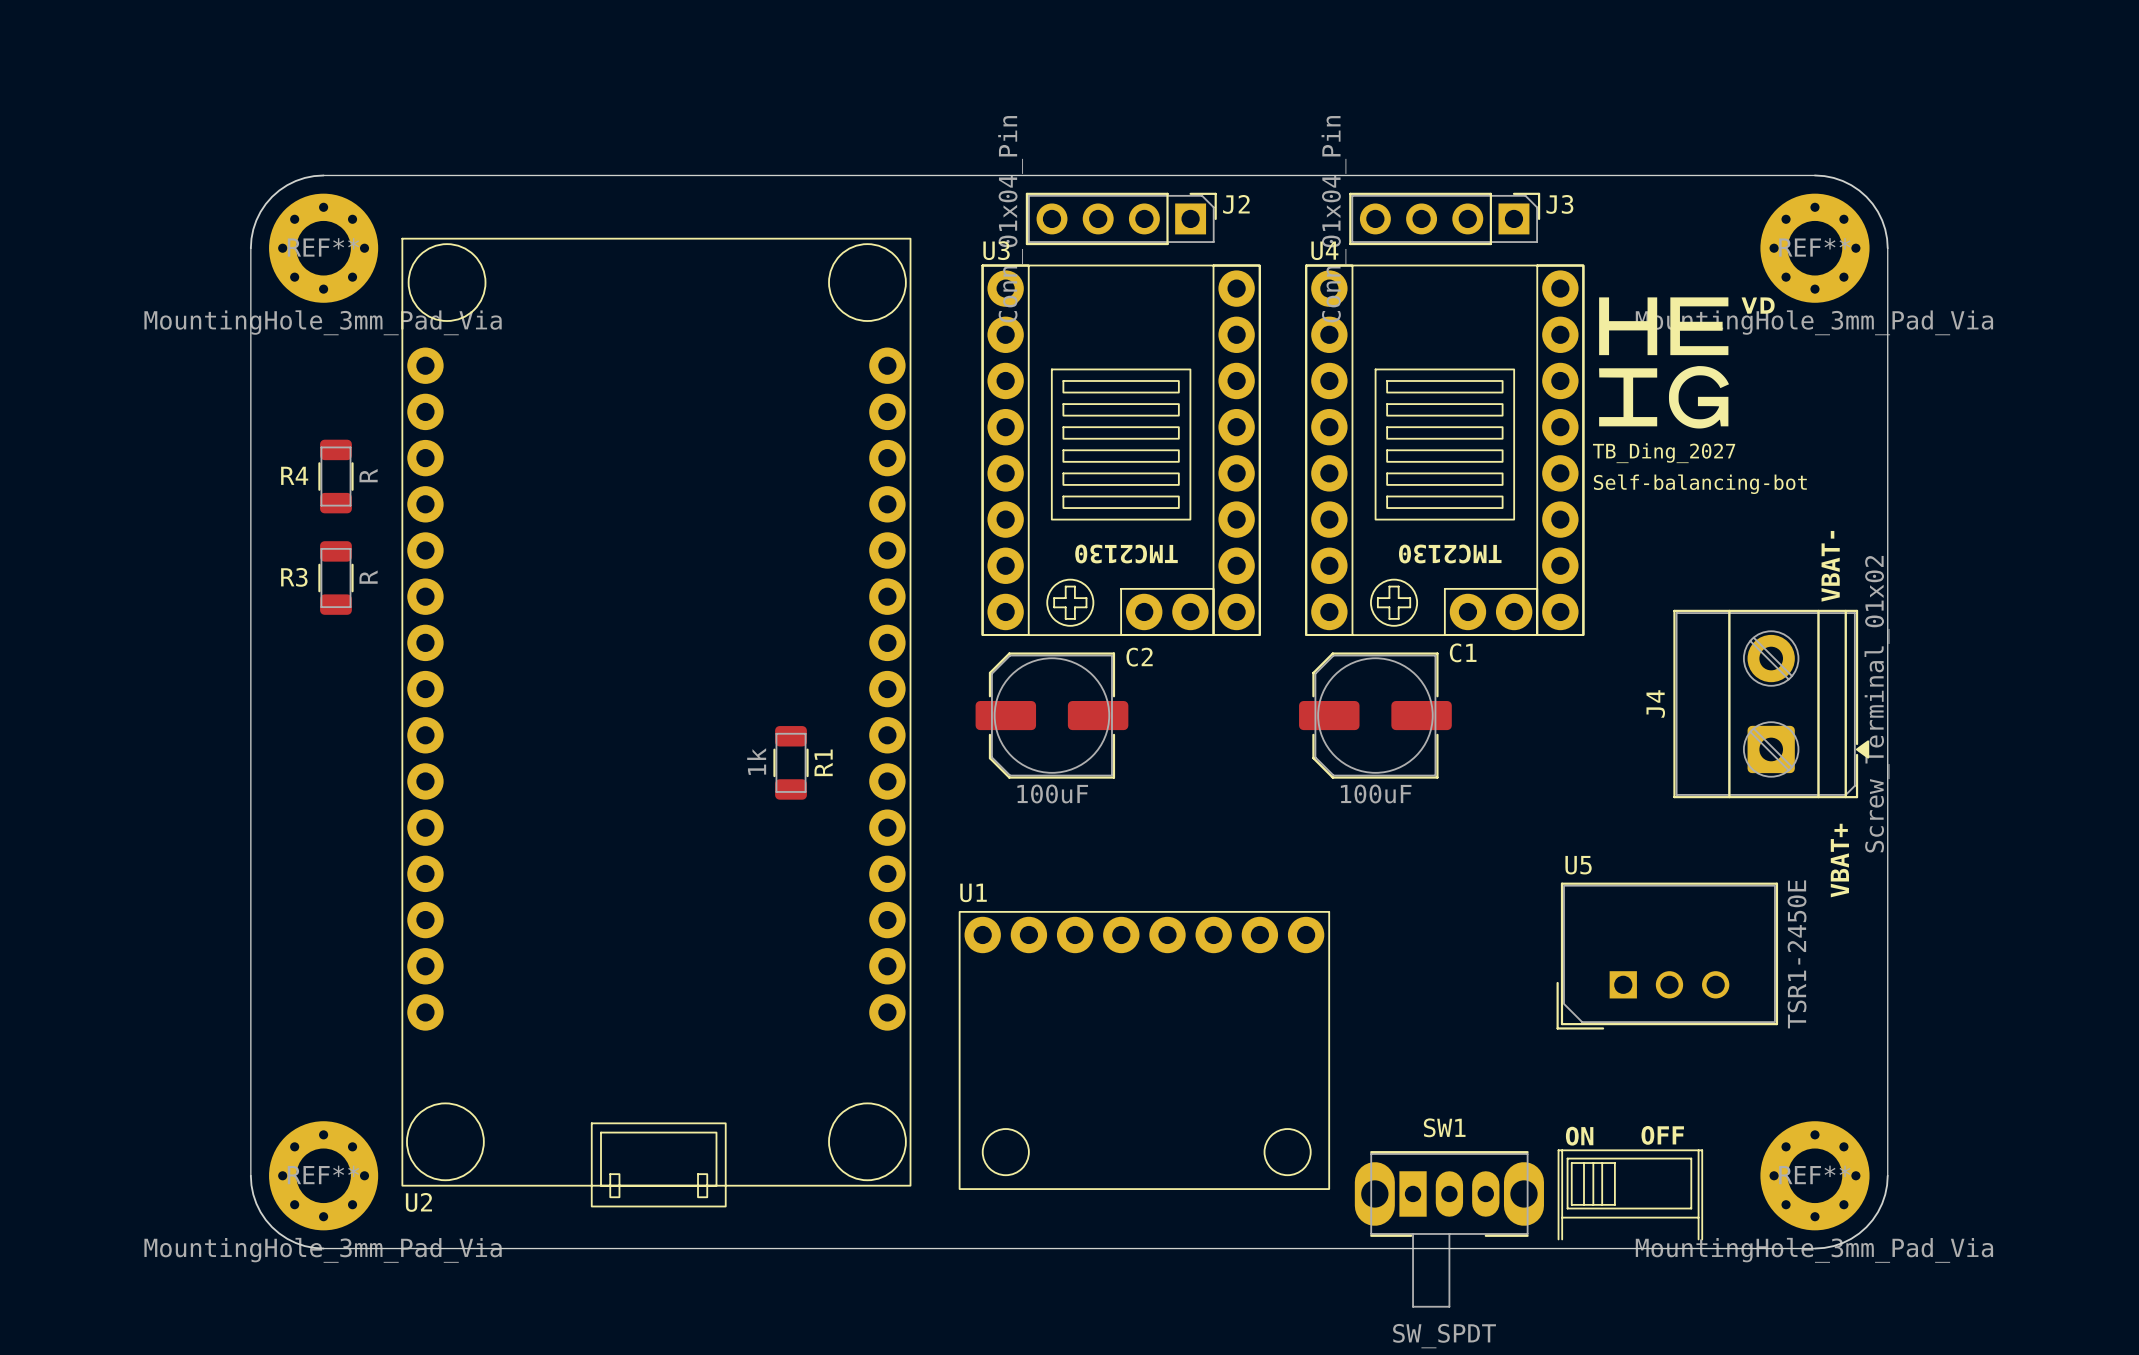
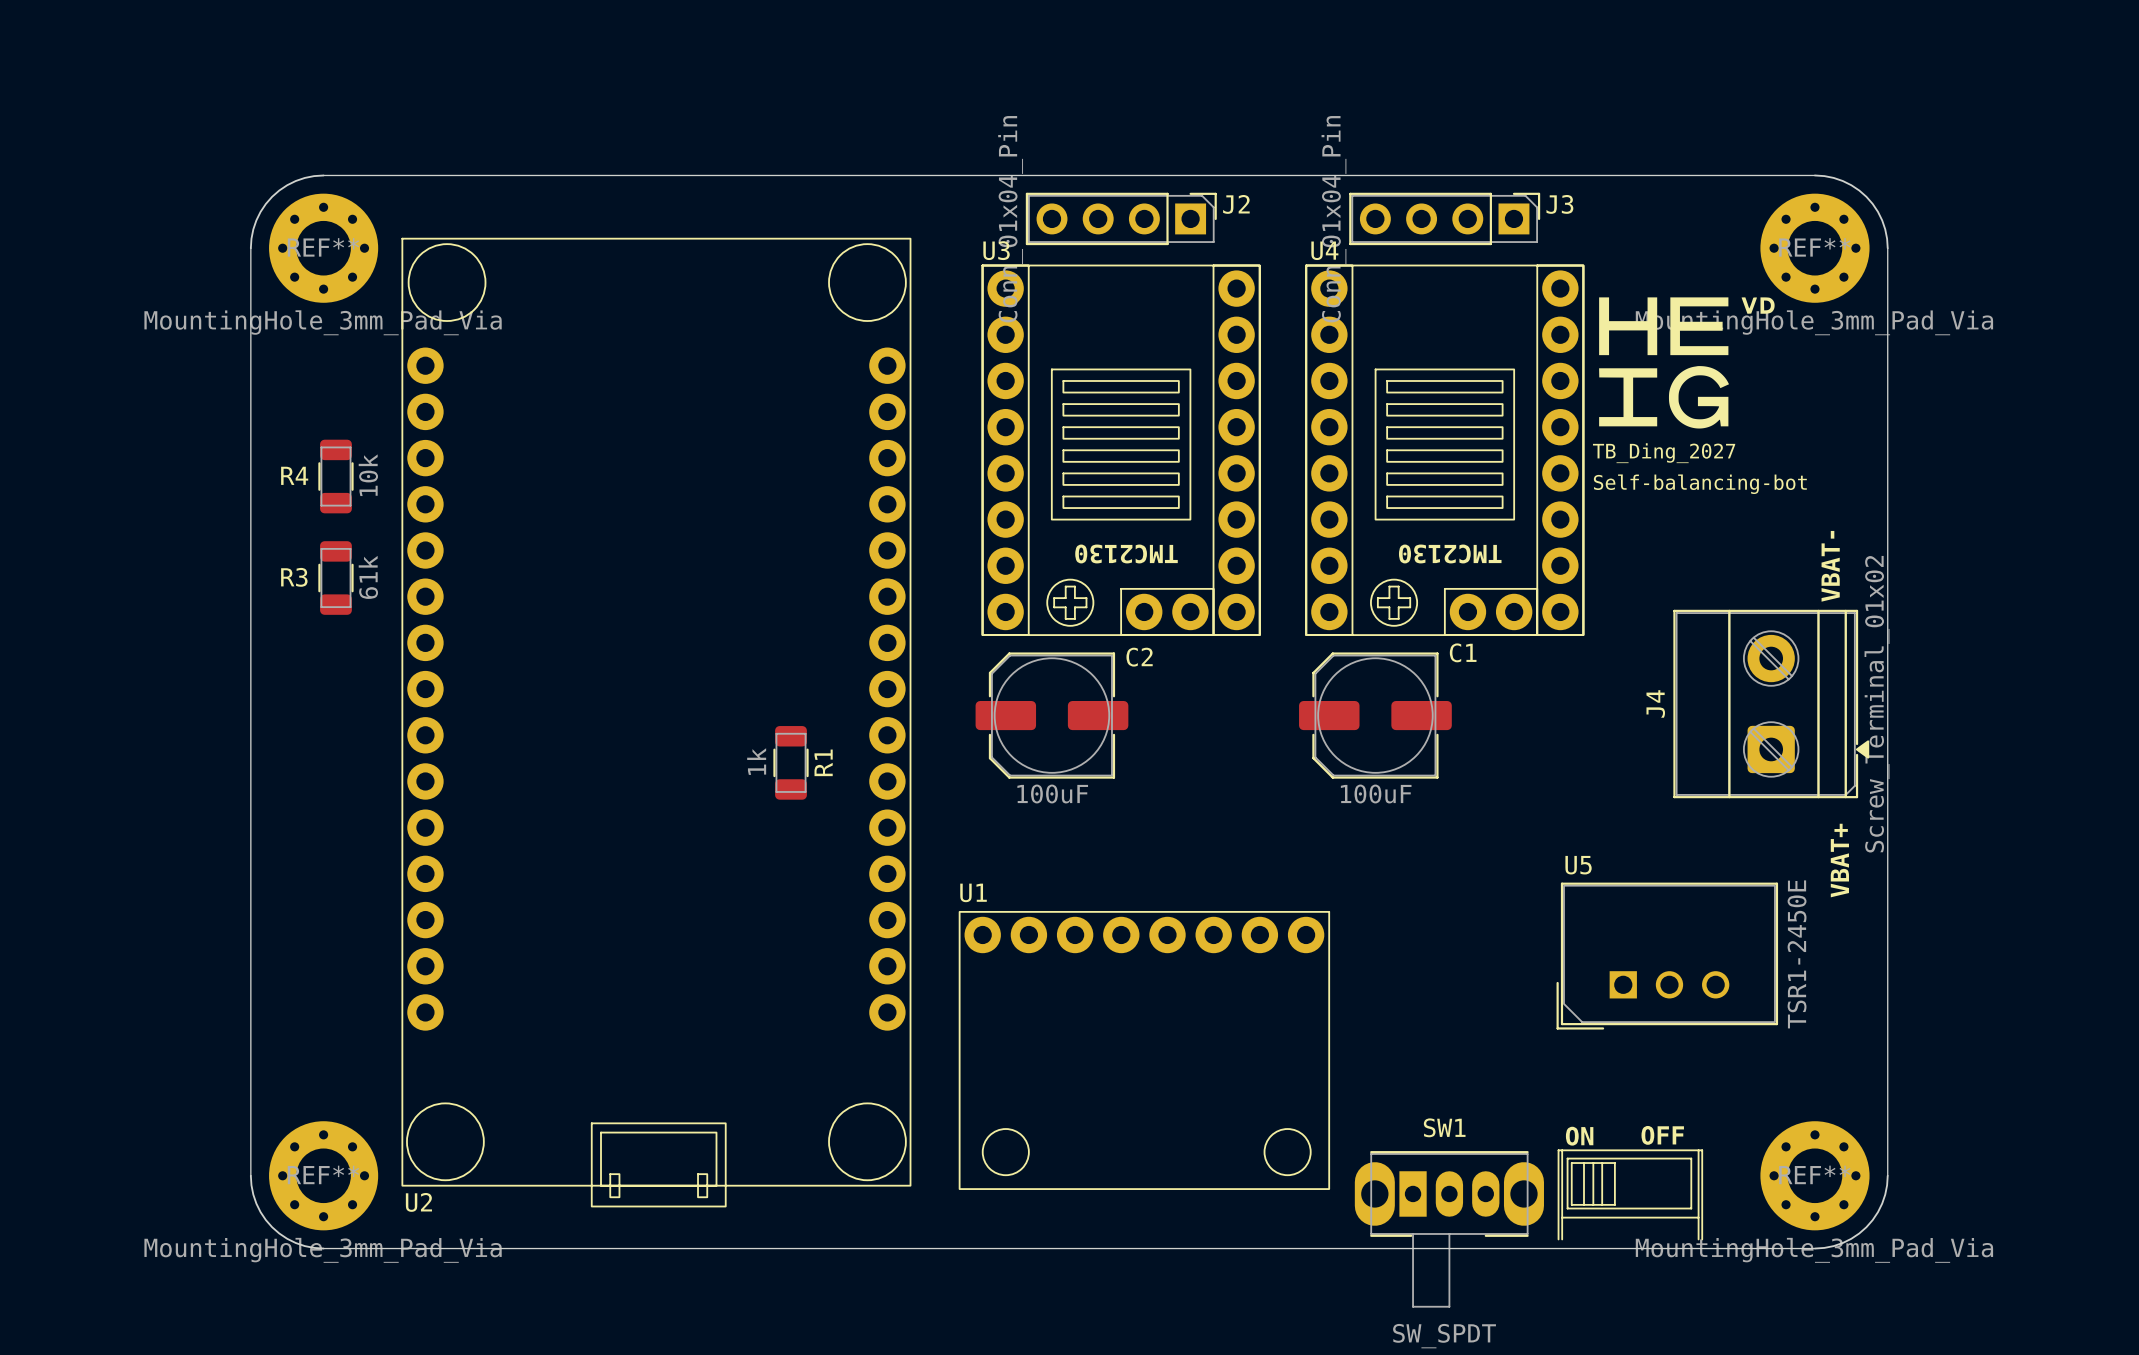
R4 value: R (368, 475) -> 10k (368, 475)
R3 value: R (368, 577) -> 61k (368, 577)

